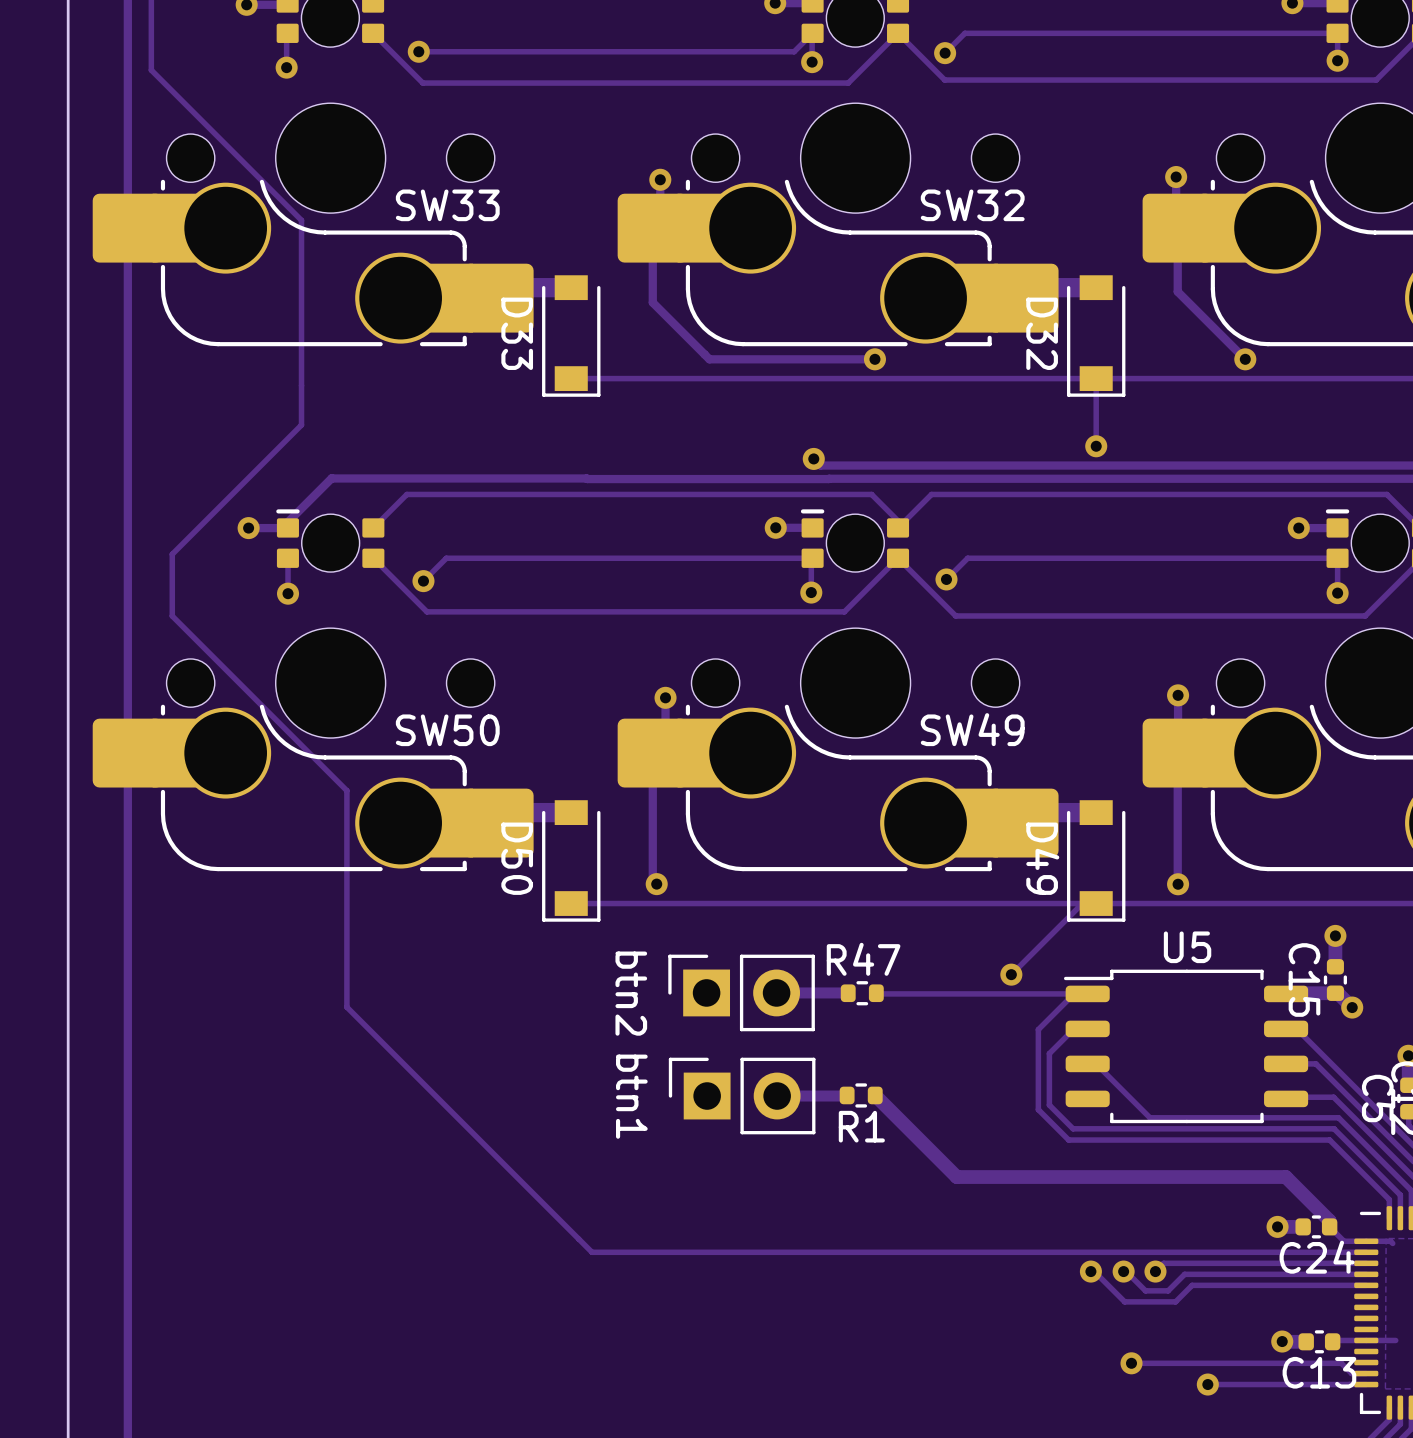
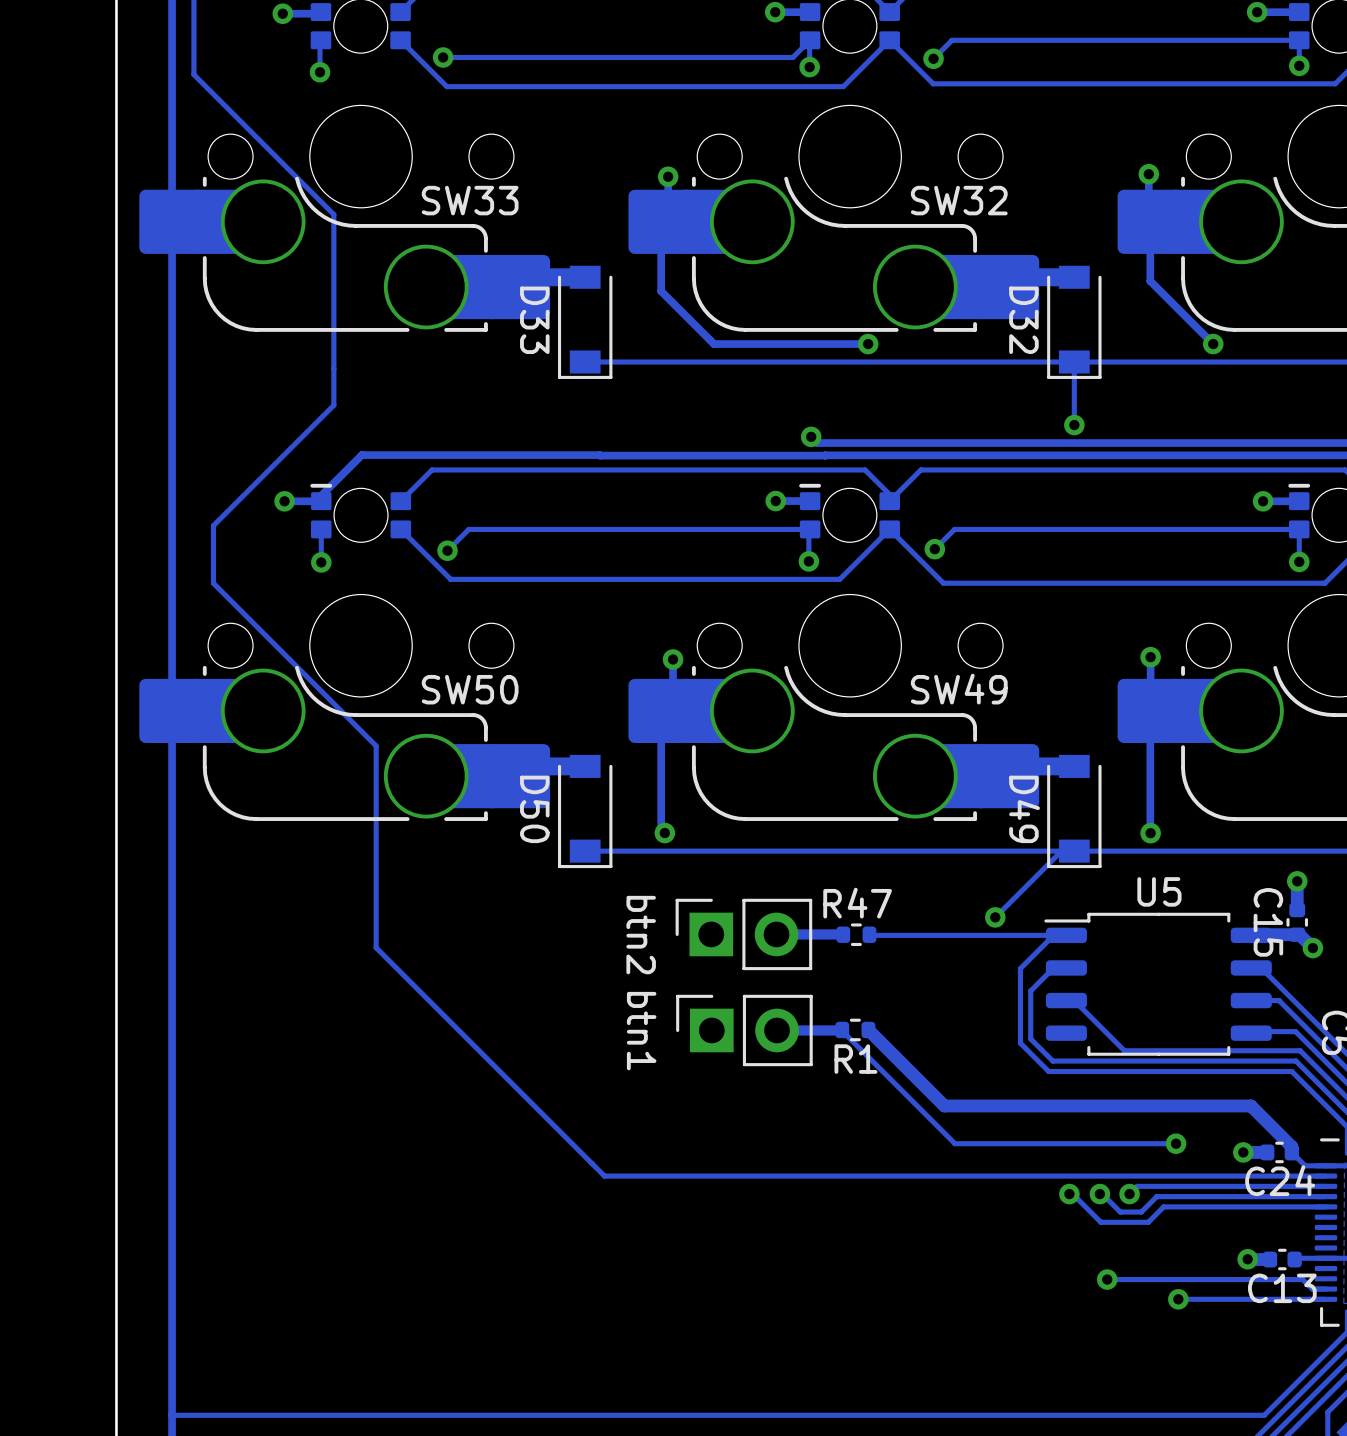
track: none -> (841, 1030) (954, 1143) (1176, 1143)
via: none -> (1176, 1143)

